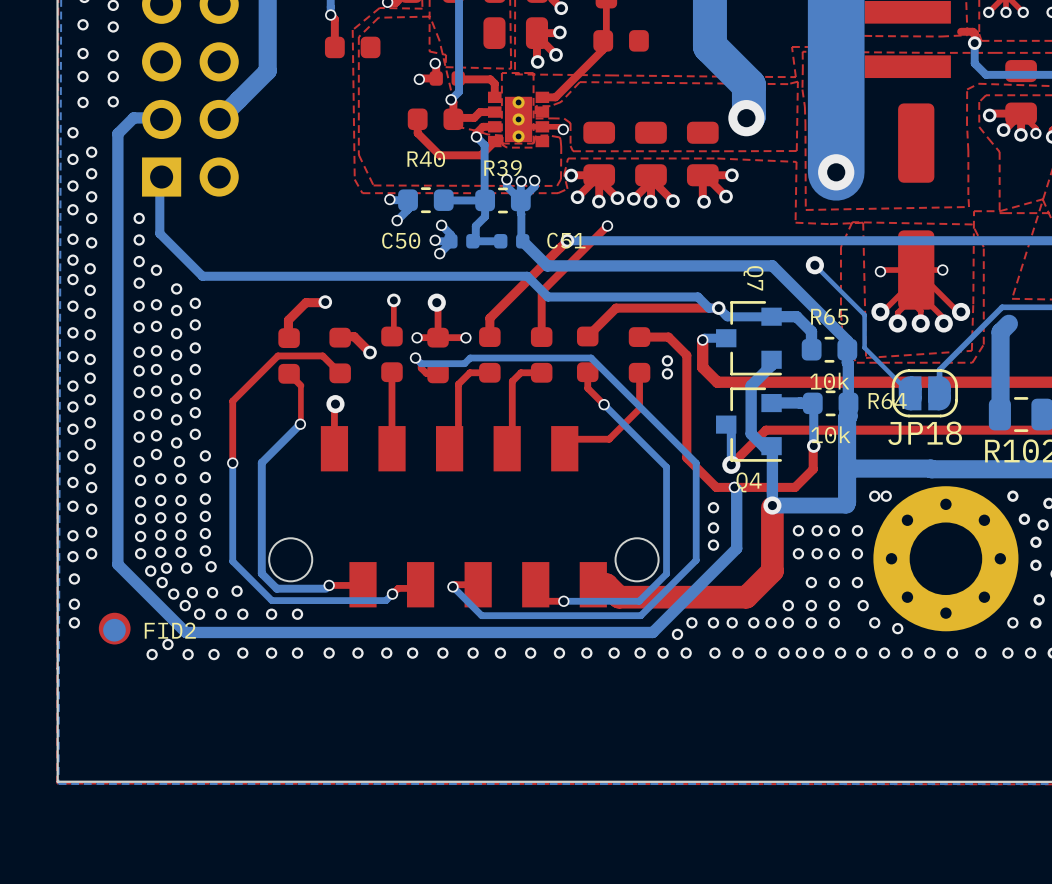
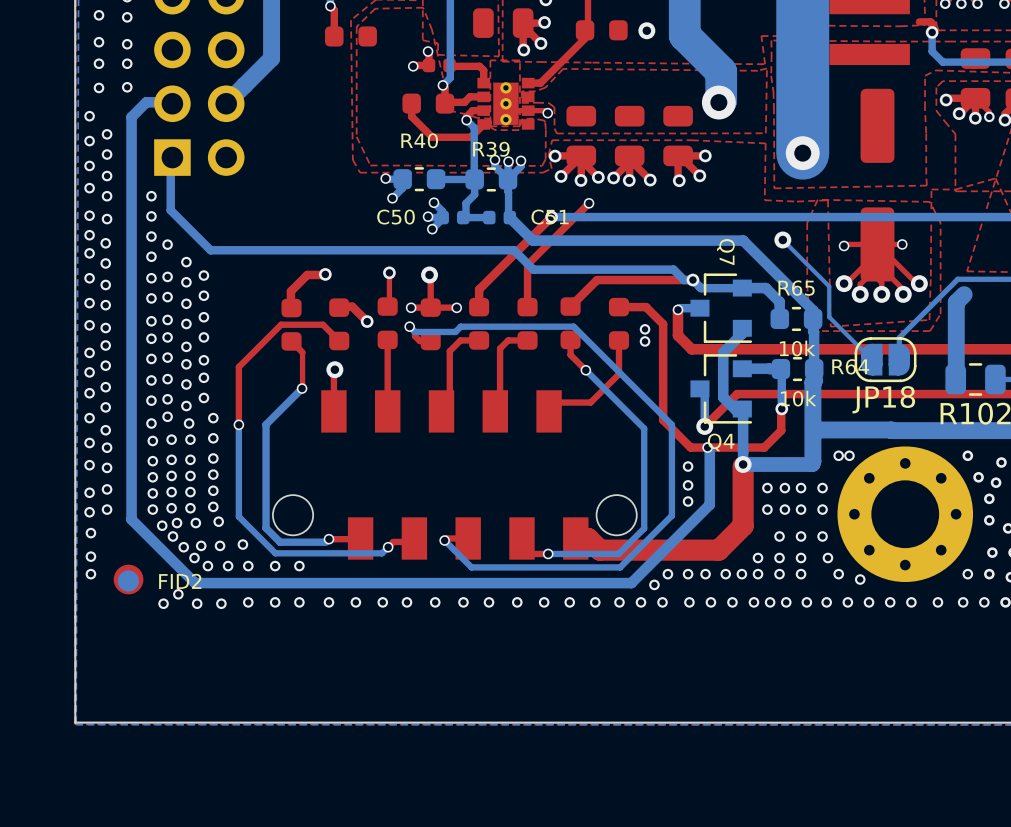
via: none -> (646, 30)

